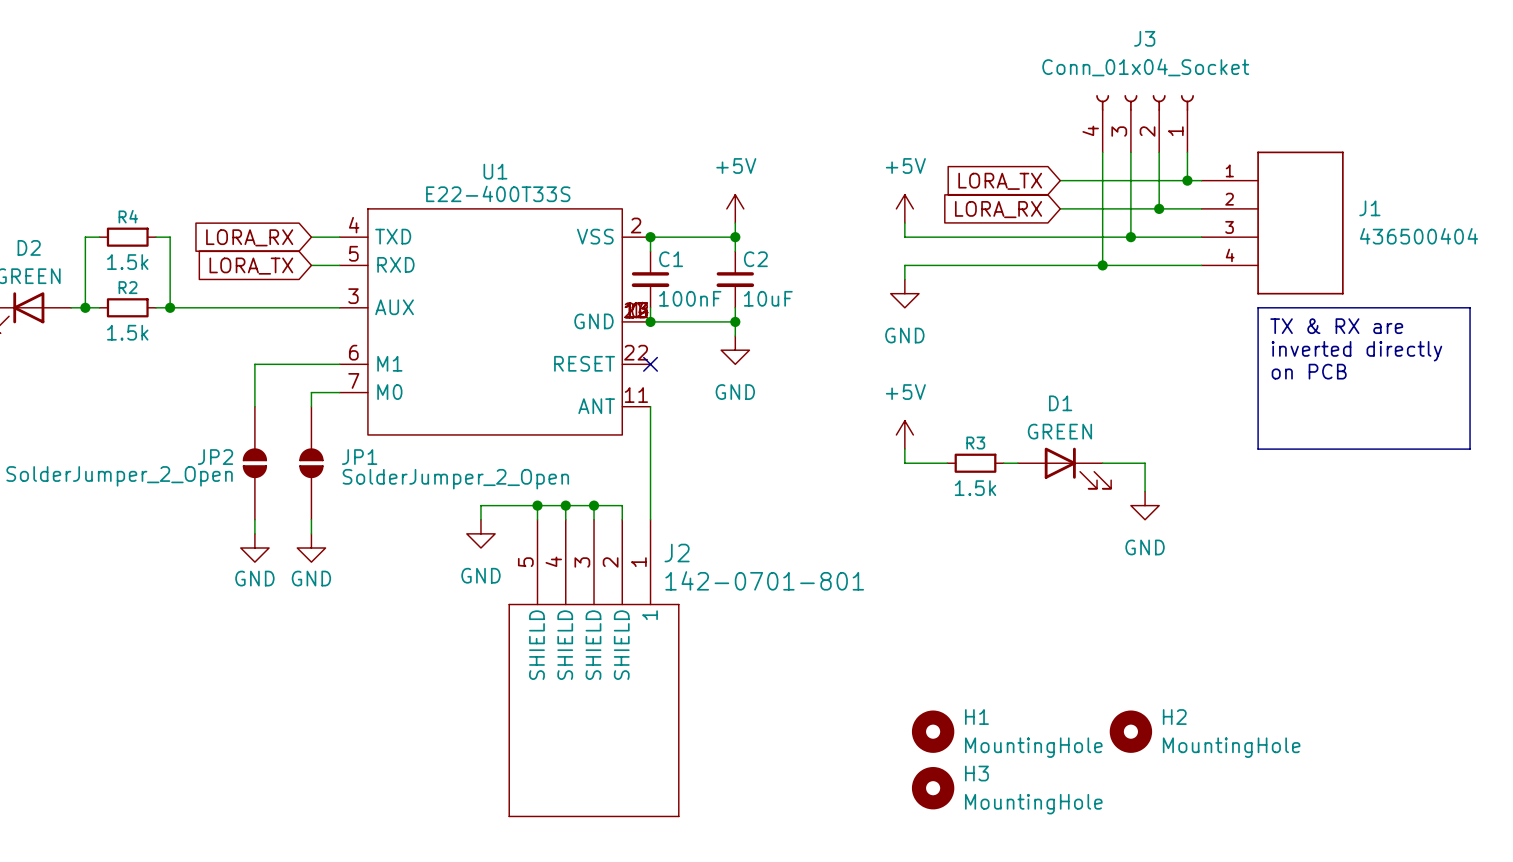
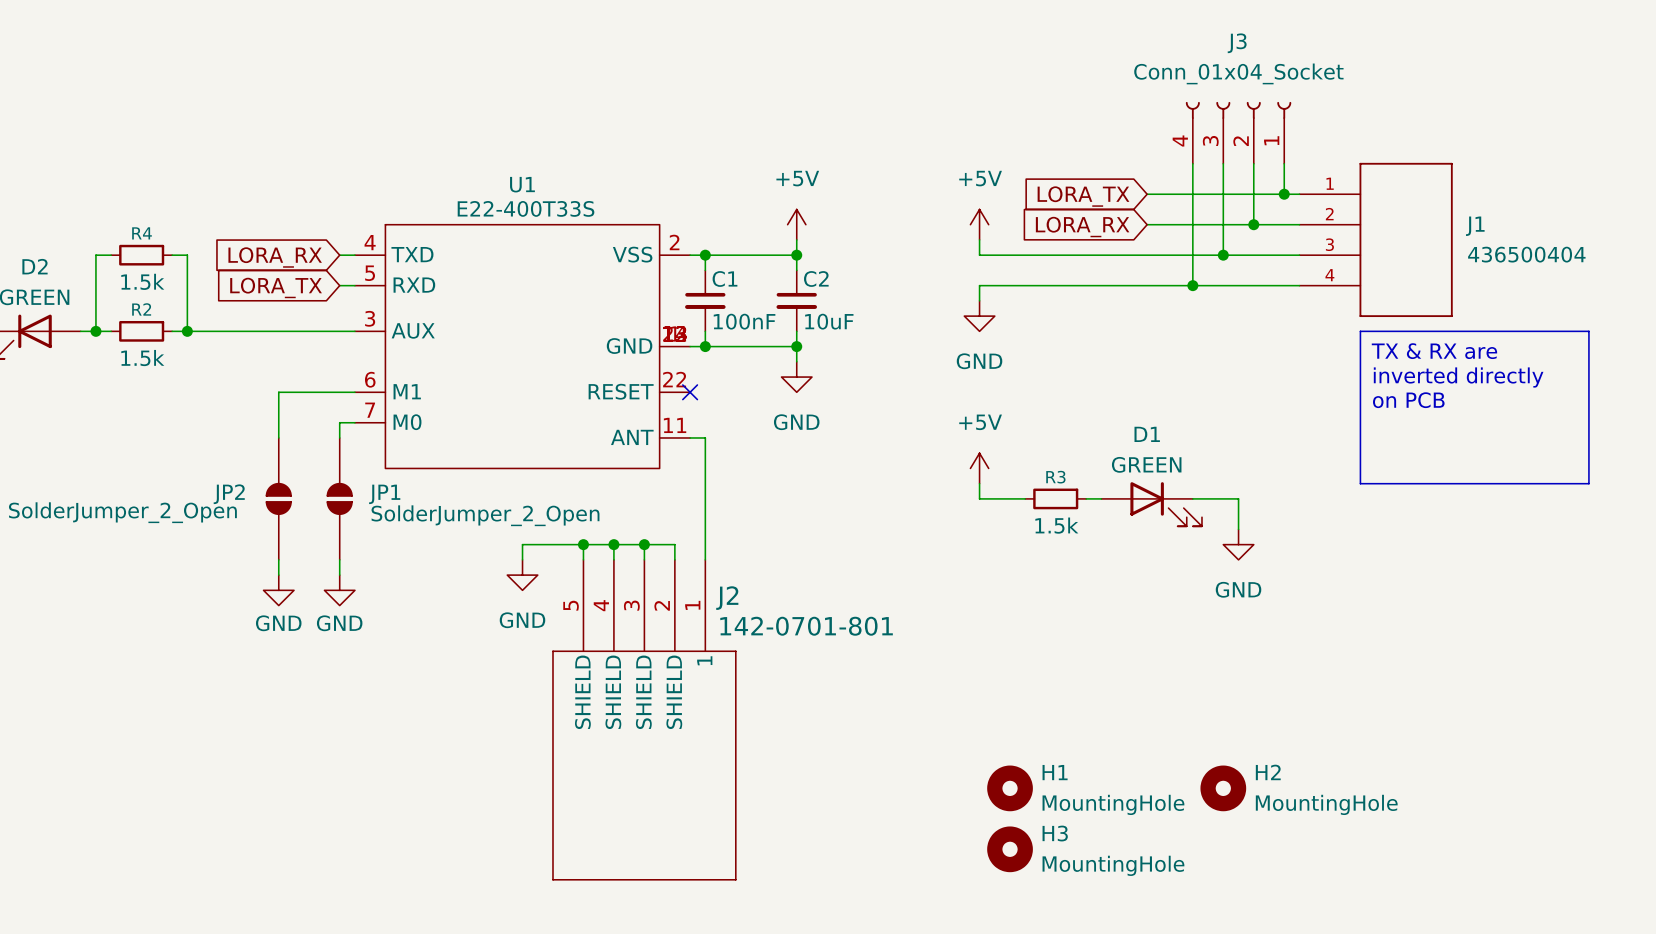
U1 symbol: [339, 208, 651, 435] -> [354, 224, 691, 469]
no-connect mark position: (650, 364) -> (690, 392)

